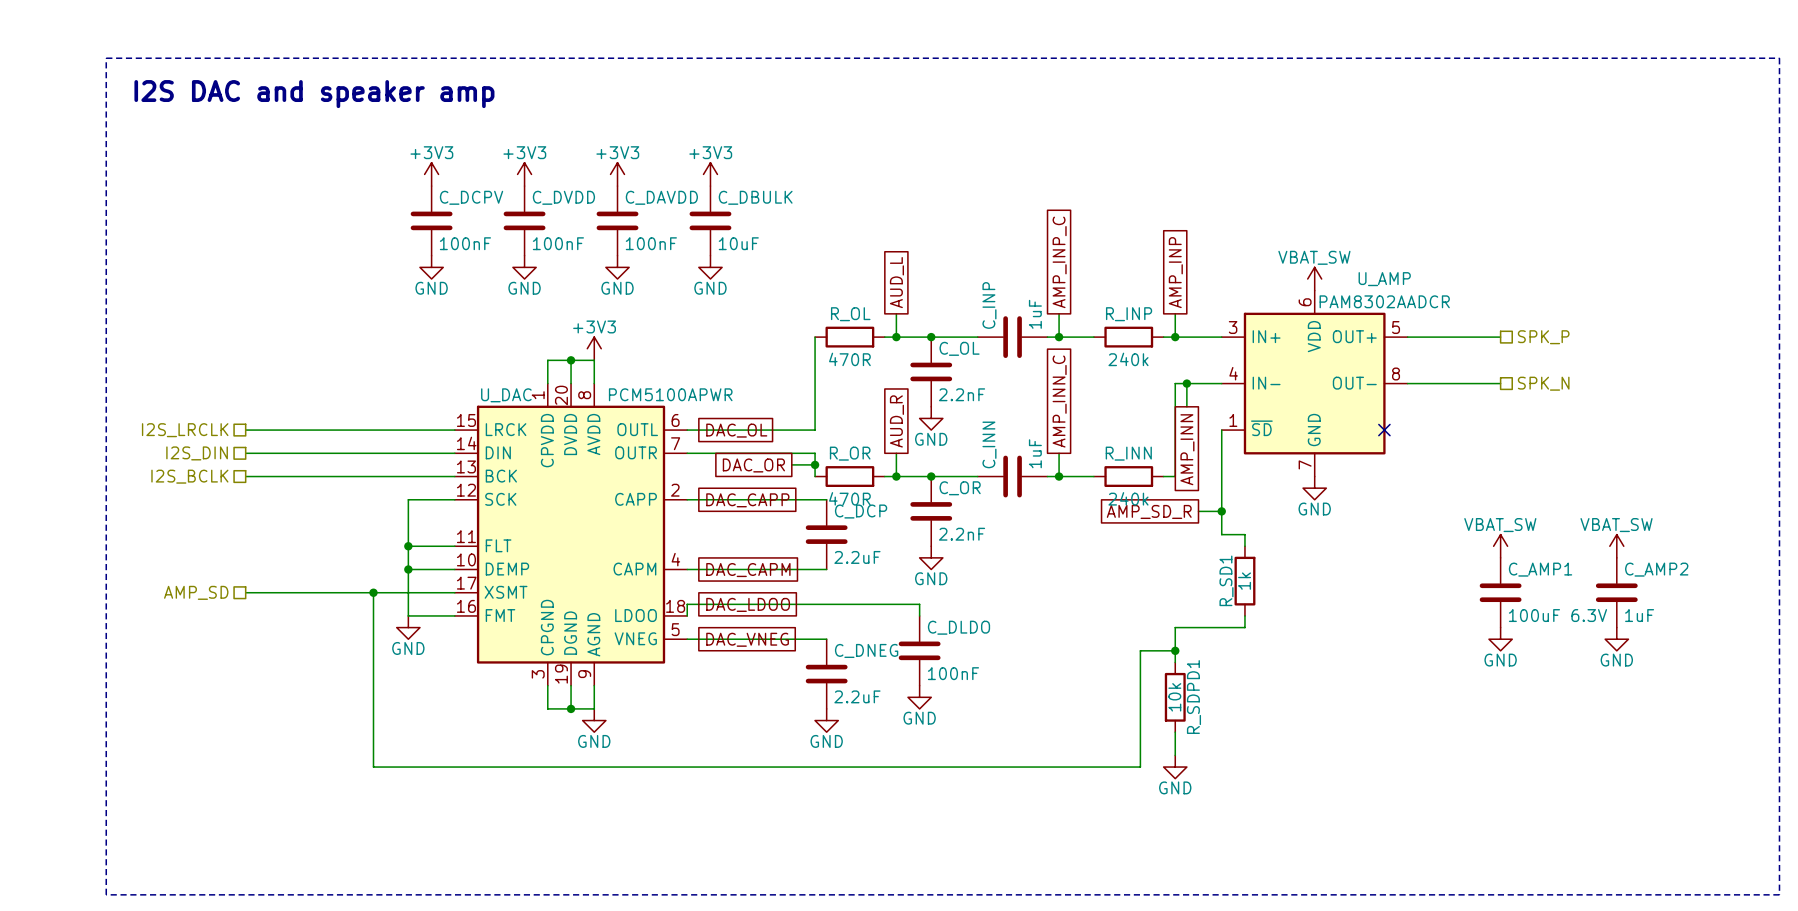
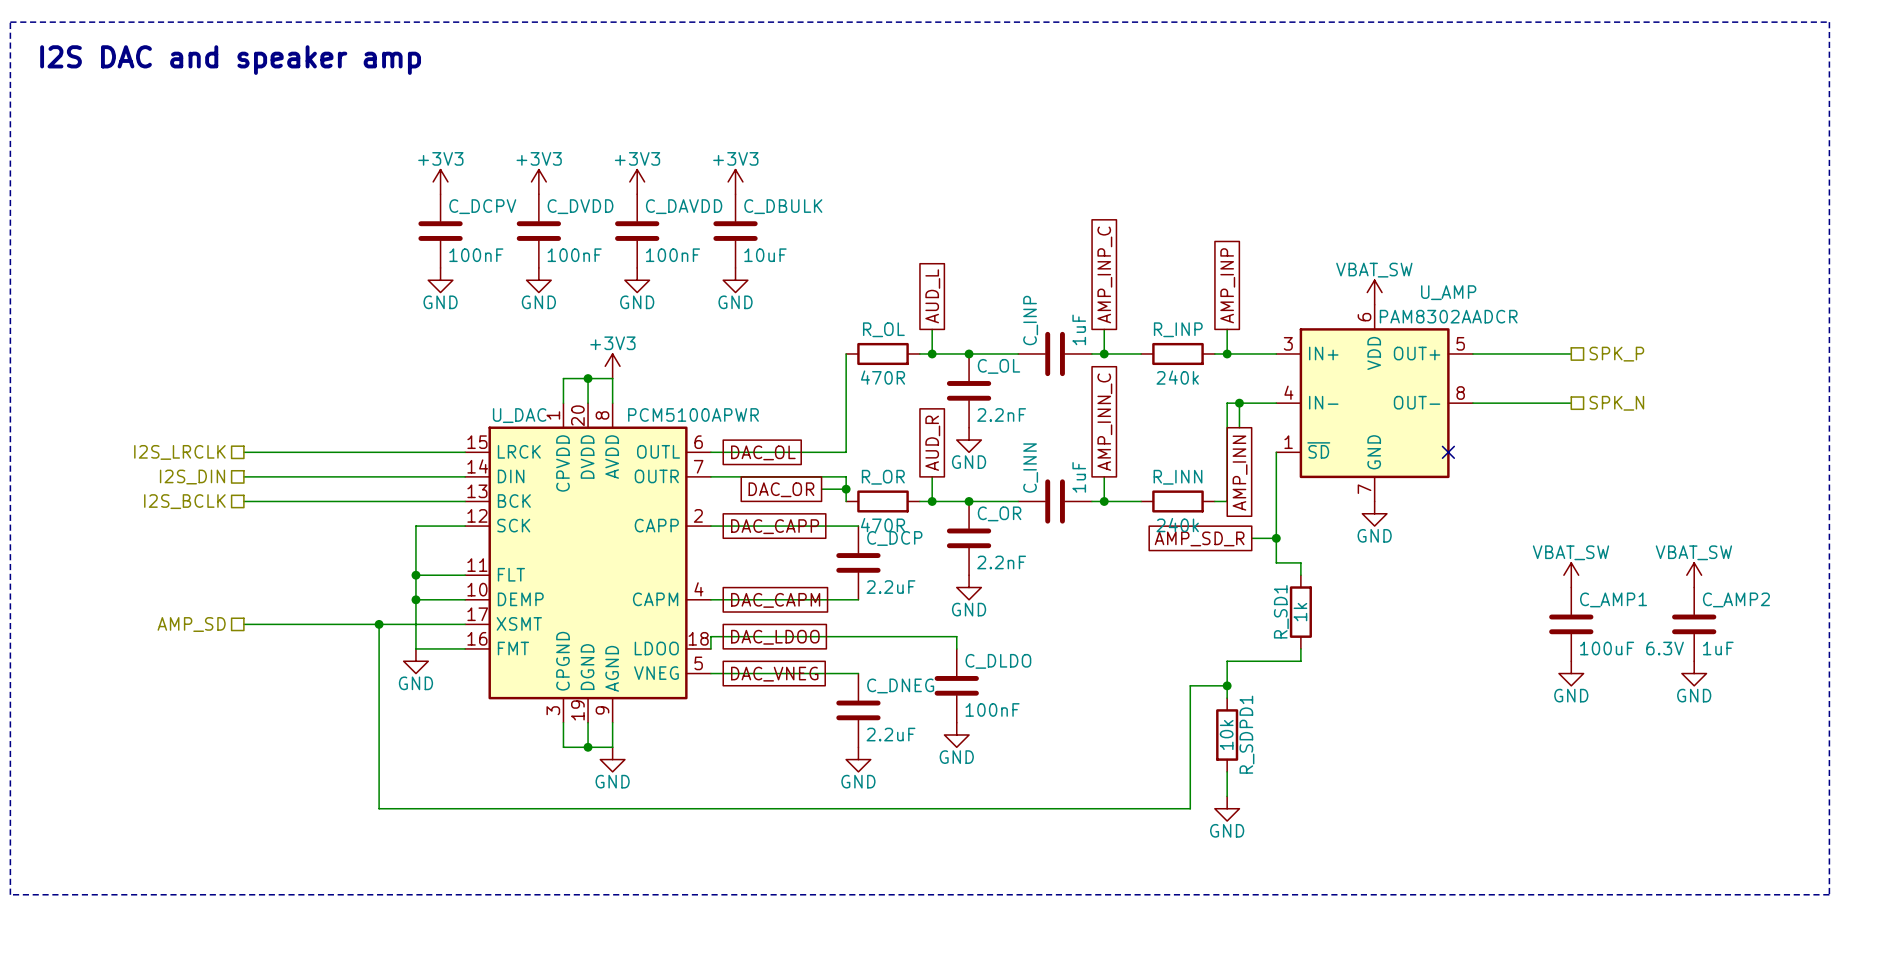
line: (106, 58) (1779, 58) (1779, 894) (106, 894) (106, 58) -> (10, 22) (10, 894) (1829, 894) (1829, 22) (10, 22)
text position: I2S DAC and speaker amp (314, 94) -> I2S DAC and speaker amp (230, 60)

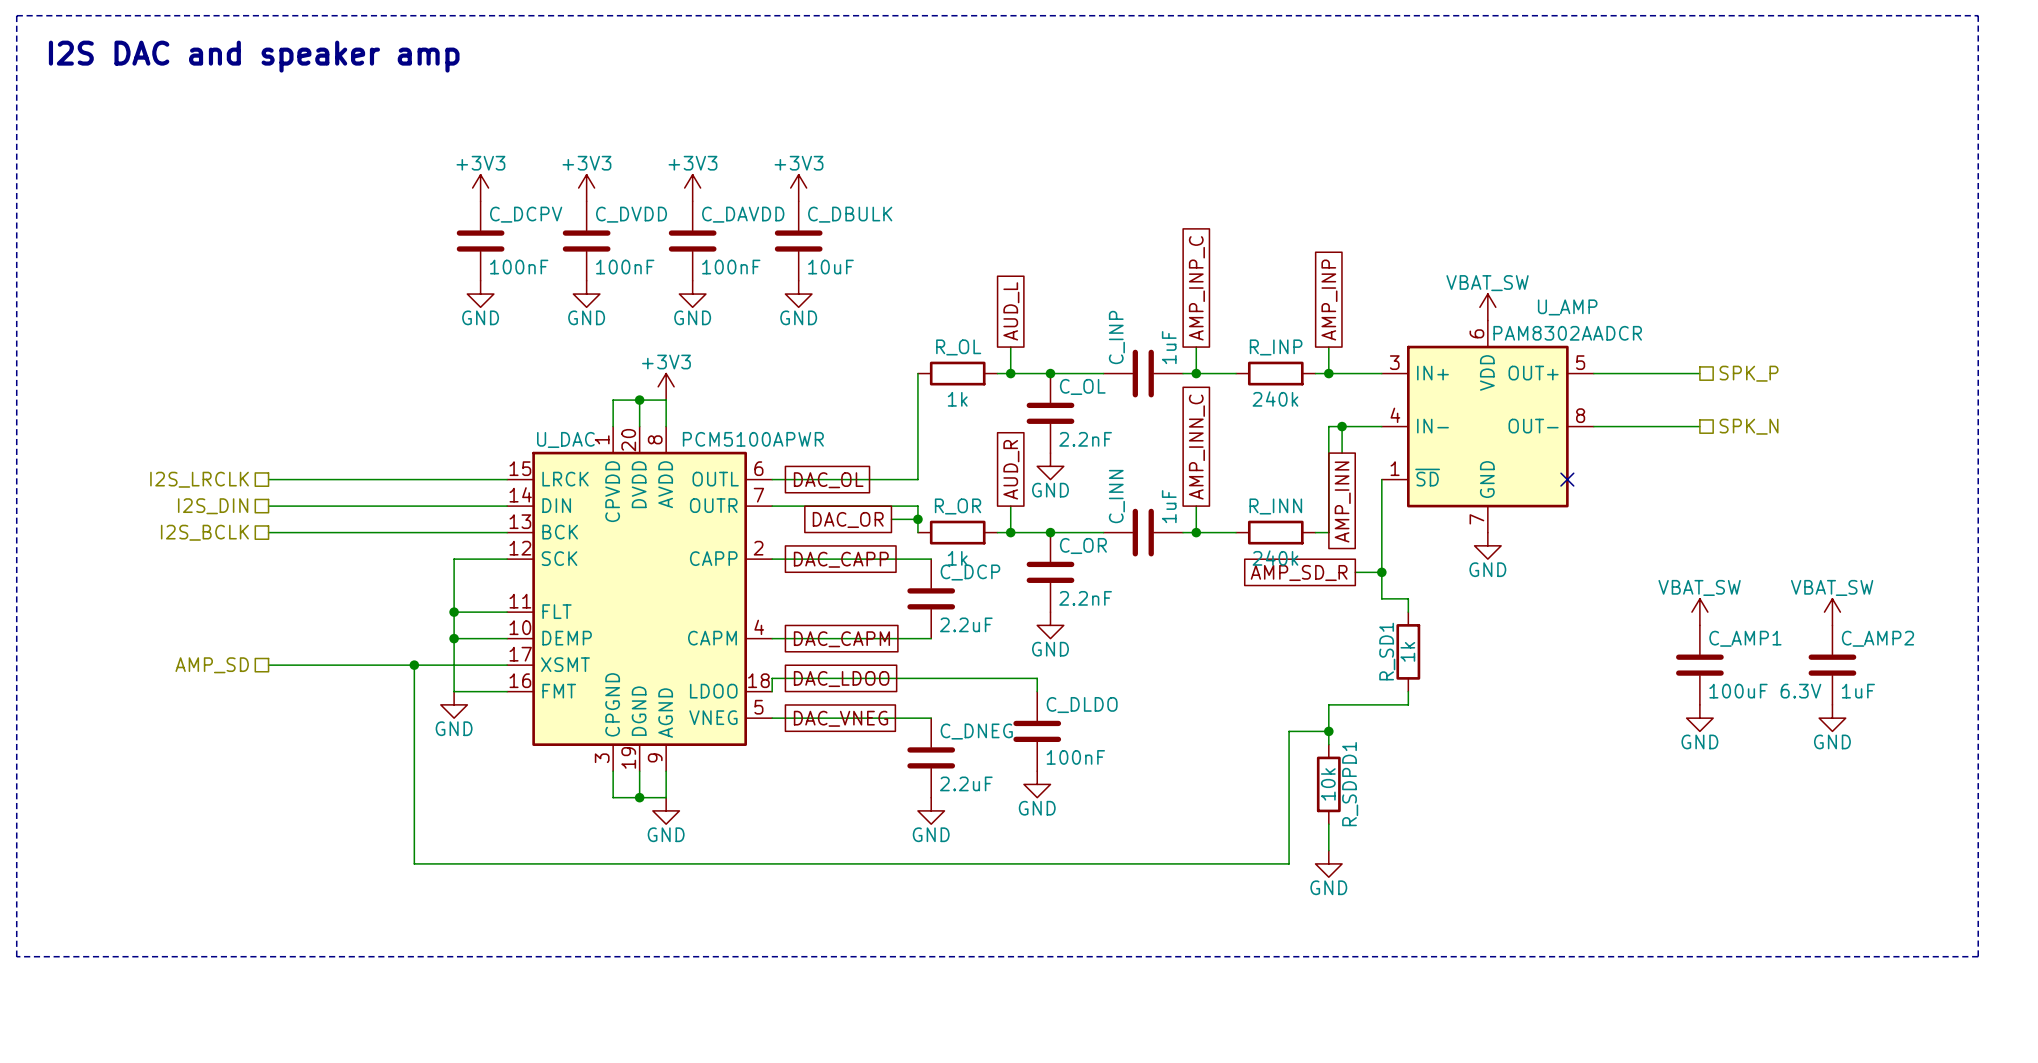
R_OL value: 470R (883, 377) -> 1k (957, 399)
R_OR value: 470R (883, 525) -> 1k (957, 558)

